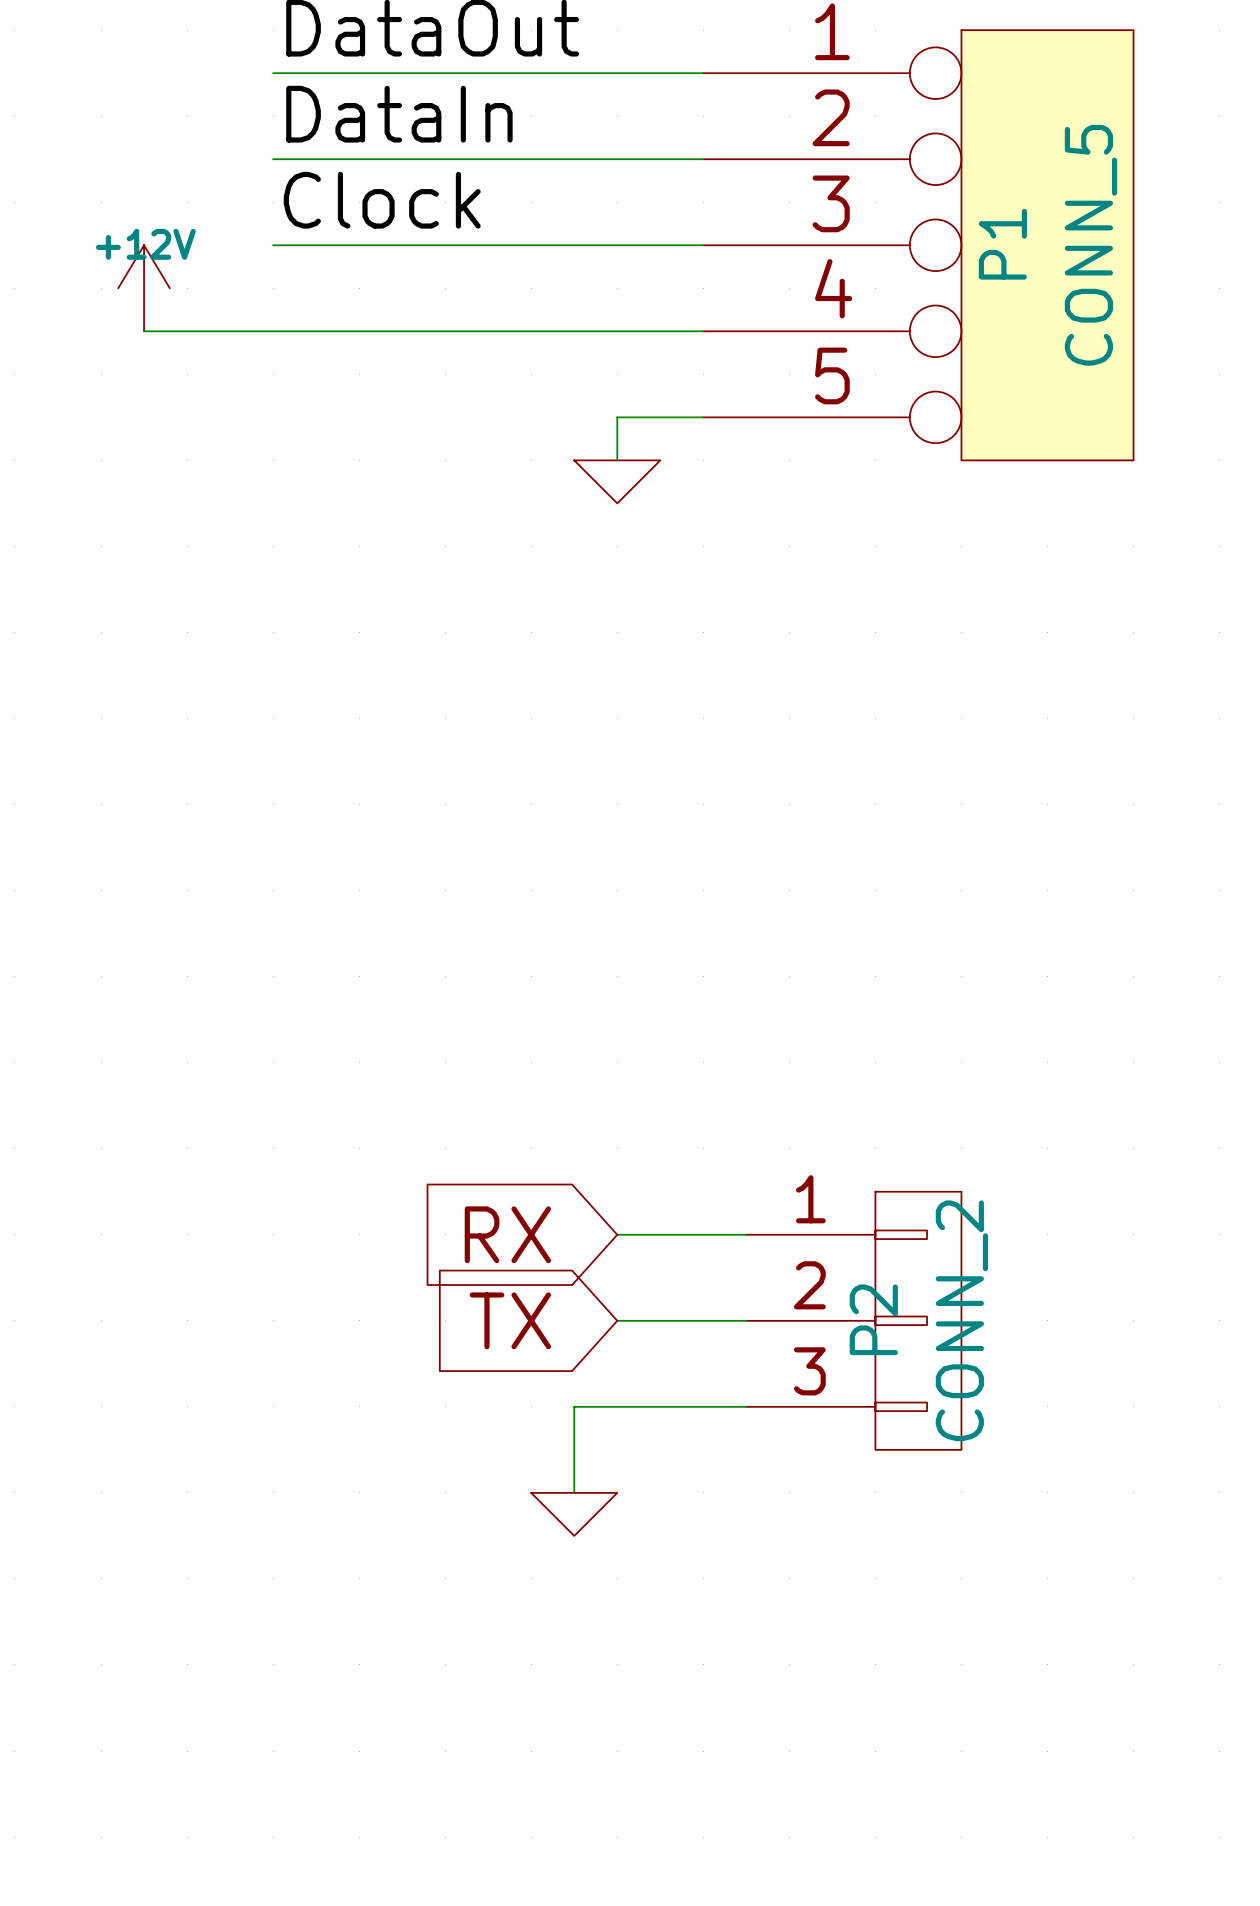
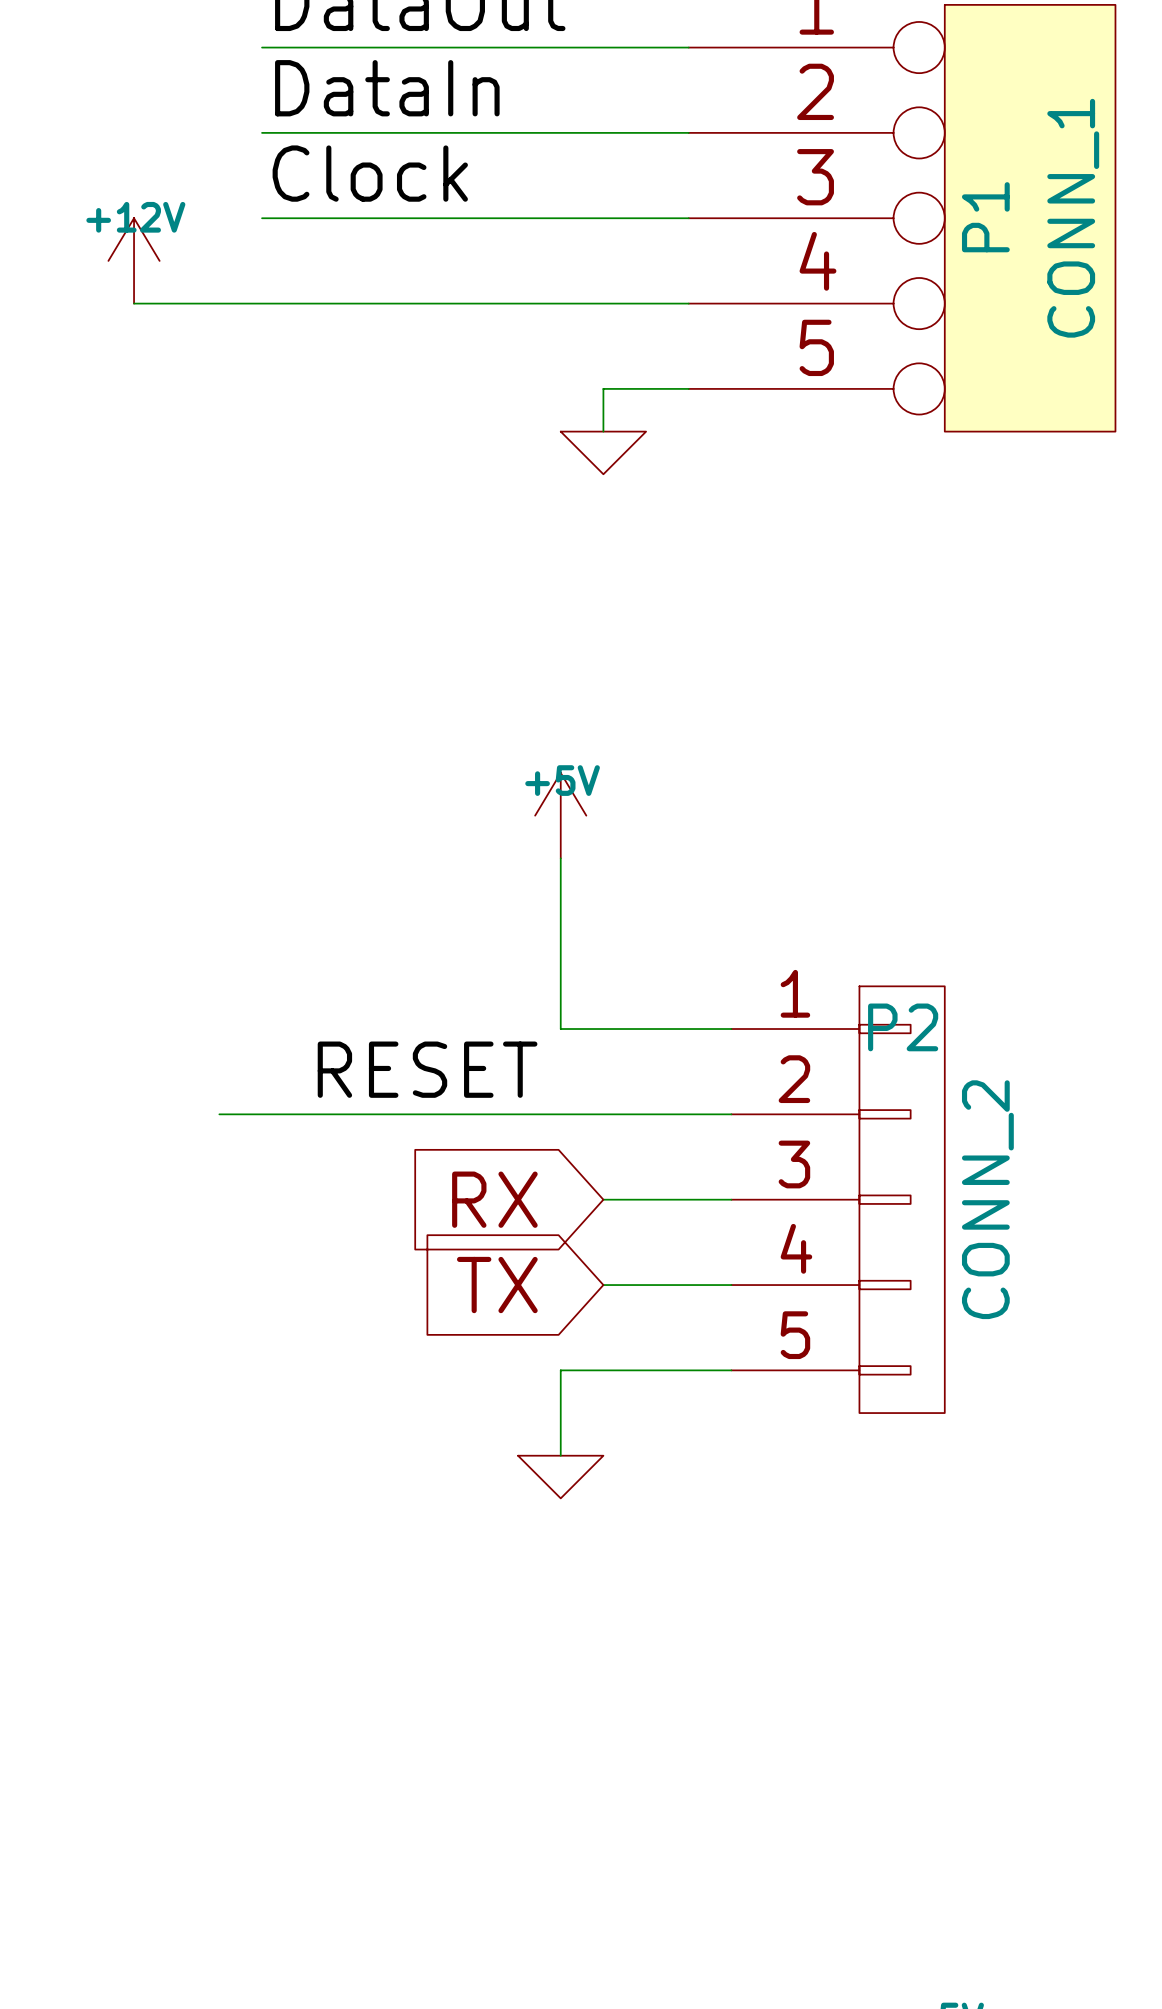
P1 value: CONN_5 (1090, 245) -> CONN_1 (1073, 218)
power symbol: none -> +5V (560, 815)
wire: none -> (560, 858) (560, 1029) (731, 1029)
label: none -> RESET (427, 1069)
wire: none -> (219, 1114) (731, 1114)
P2 symbol: [746, 1191, 962, 1450] -> [731, 986, 945, 1414]
P2 name position: P2 (873, 1319) -> P2 (903, 1027)

